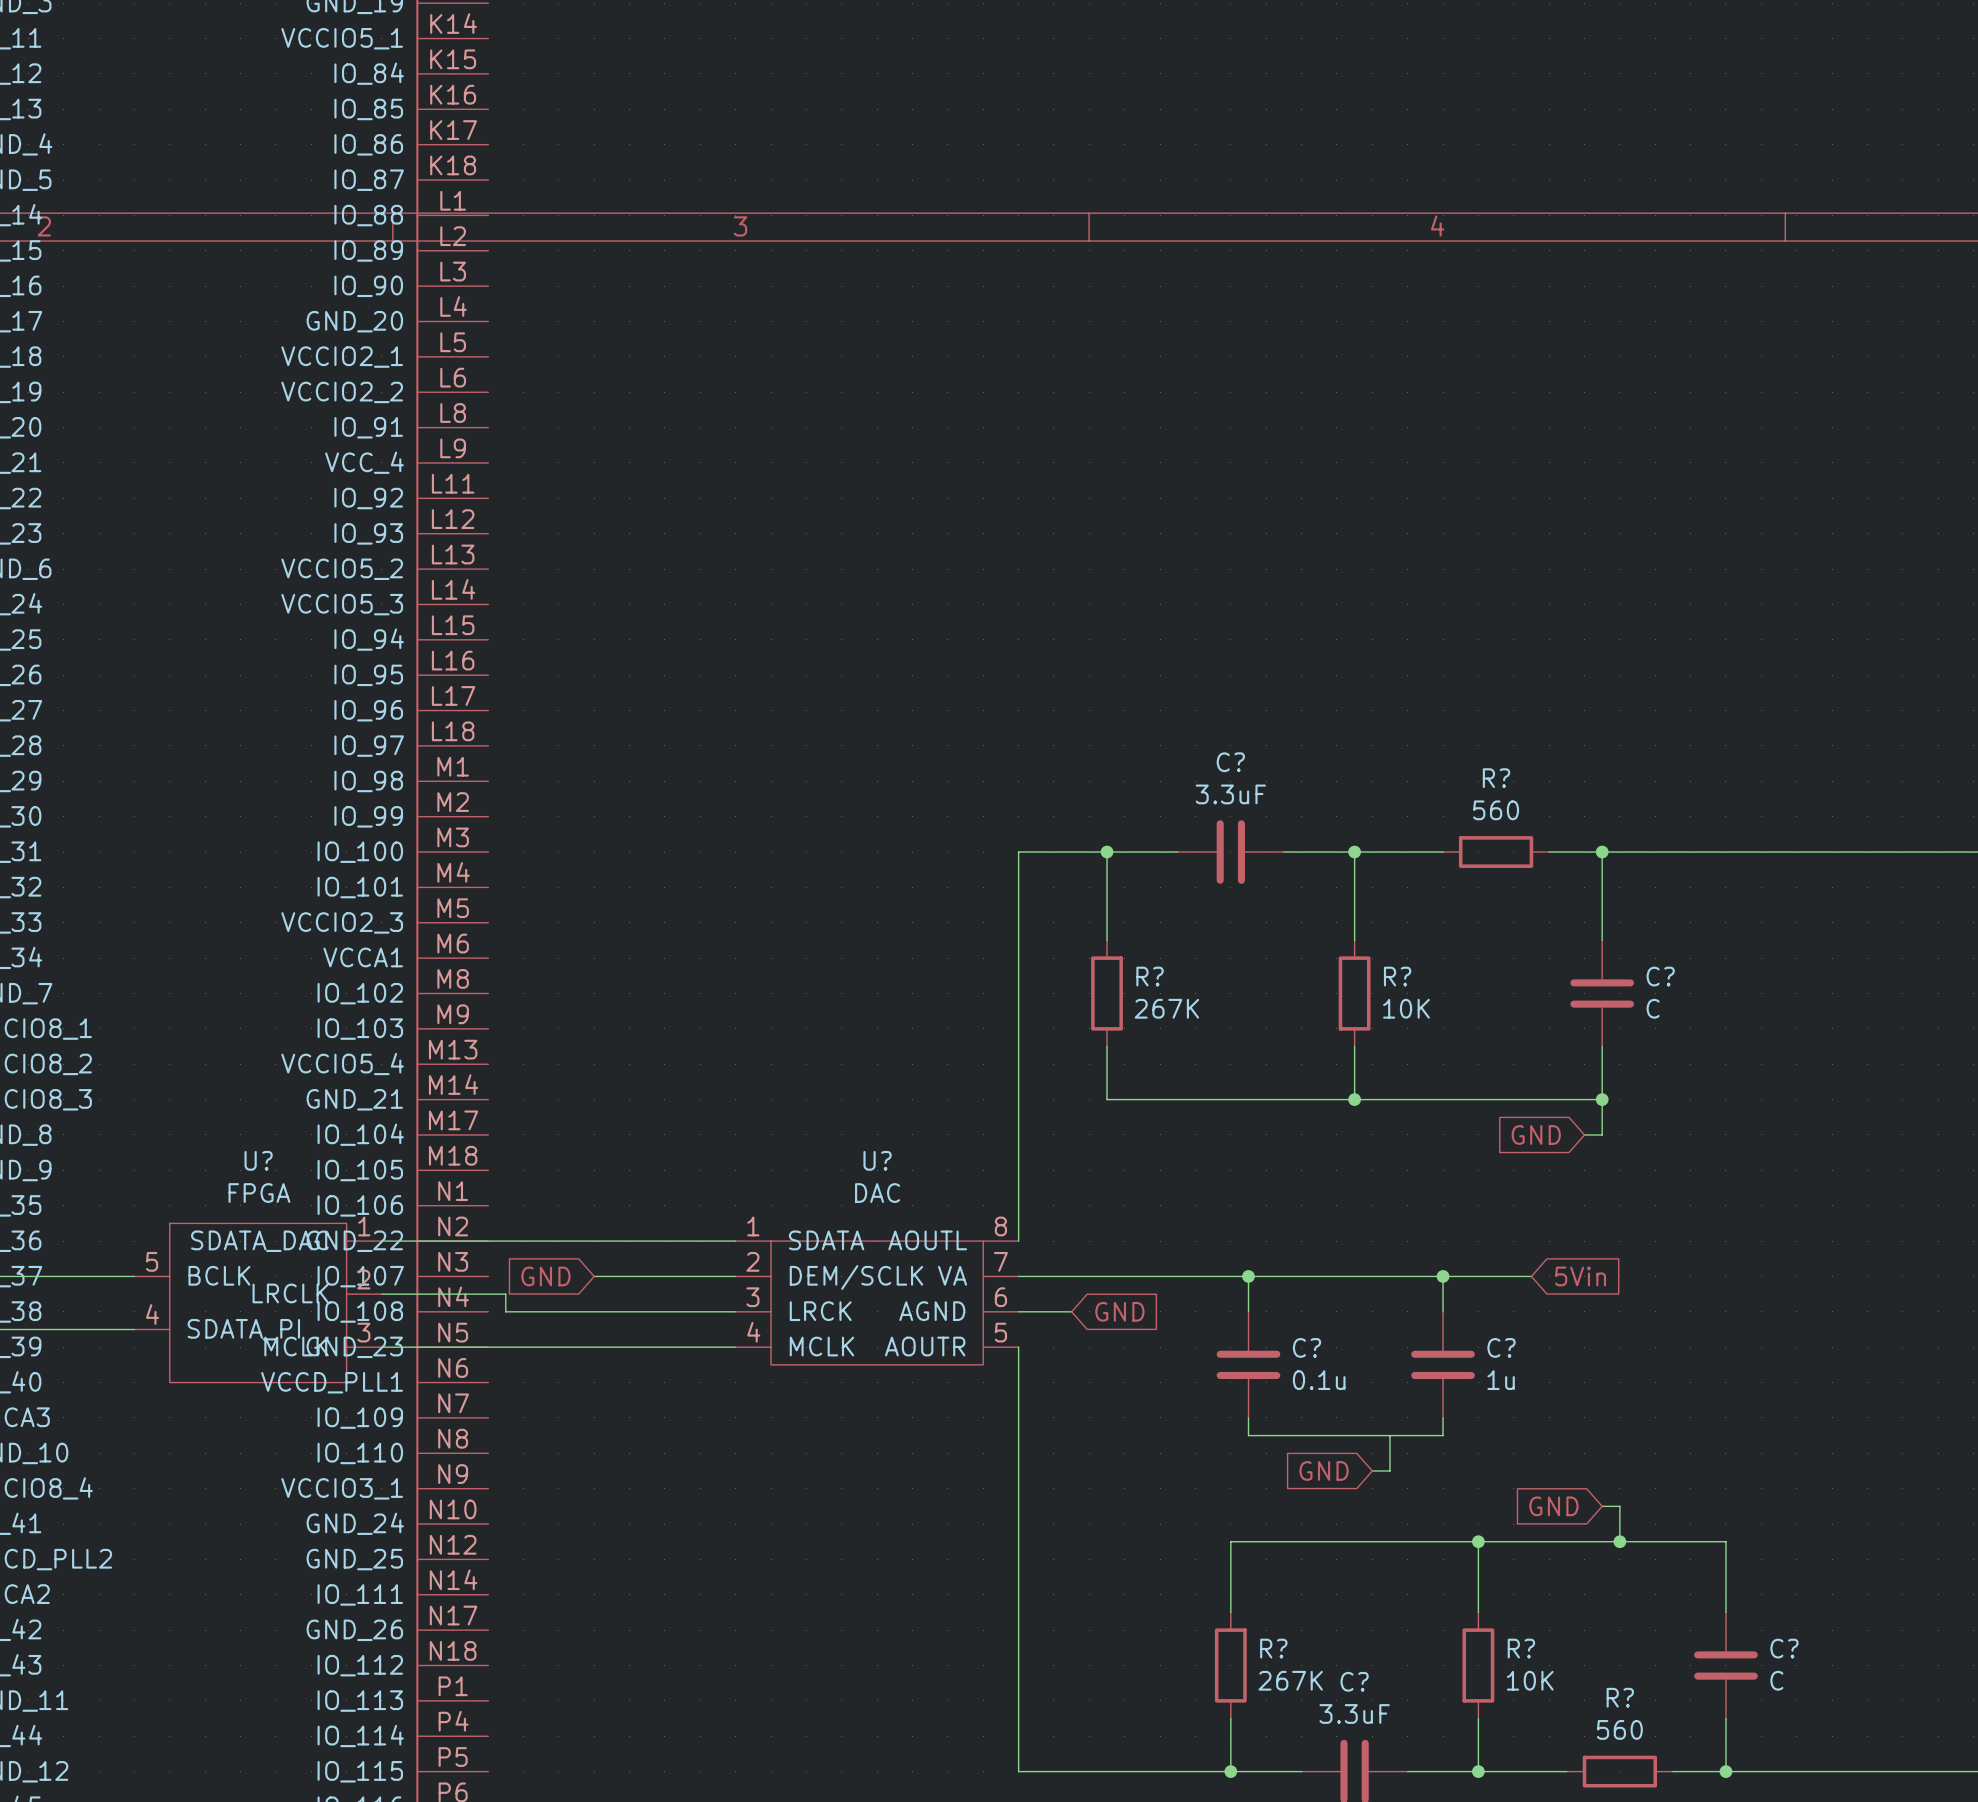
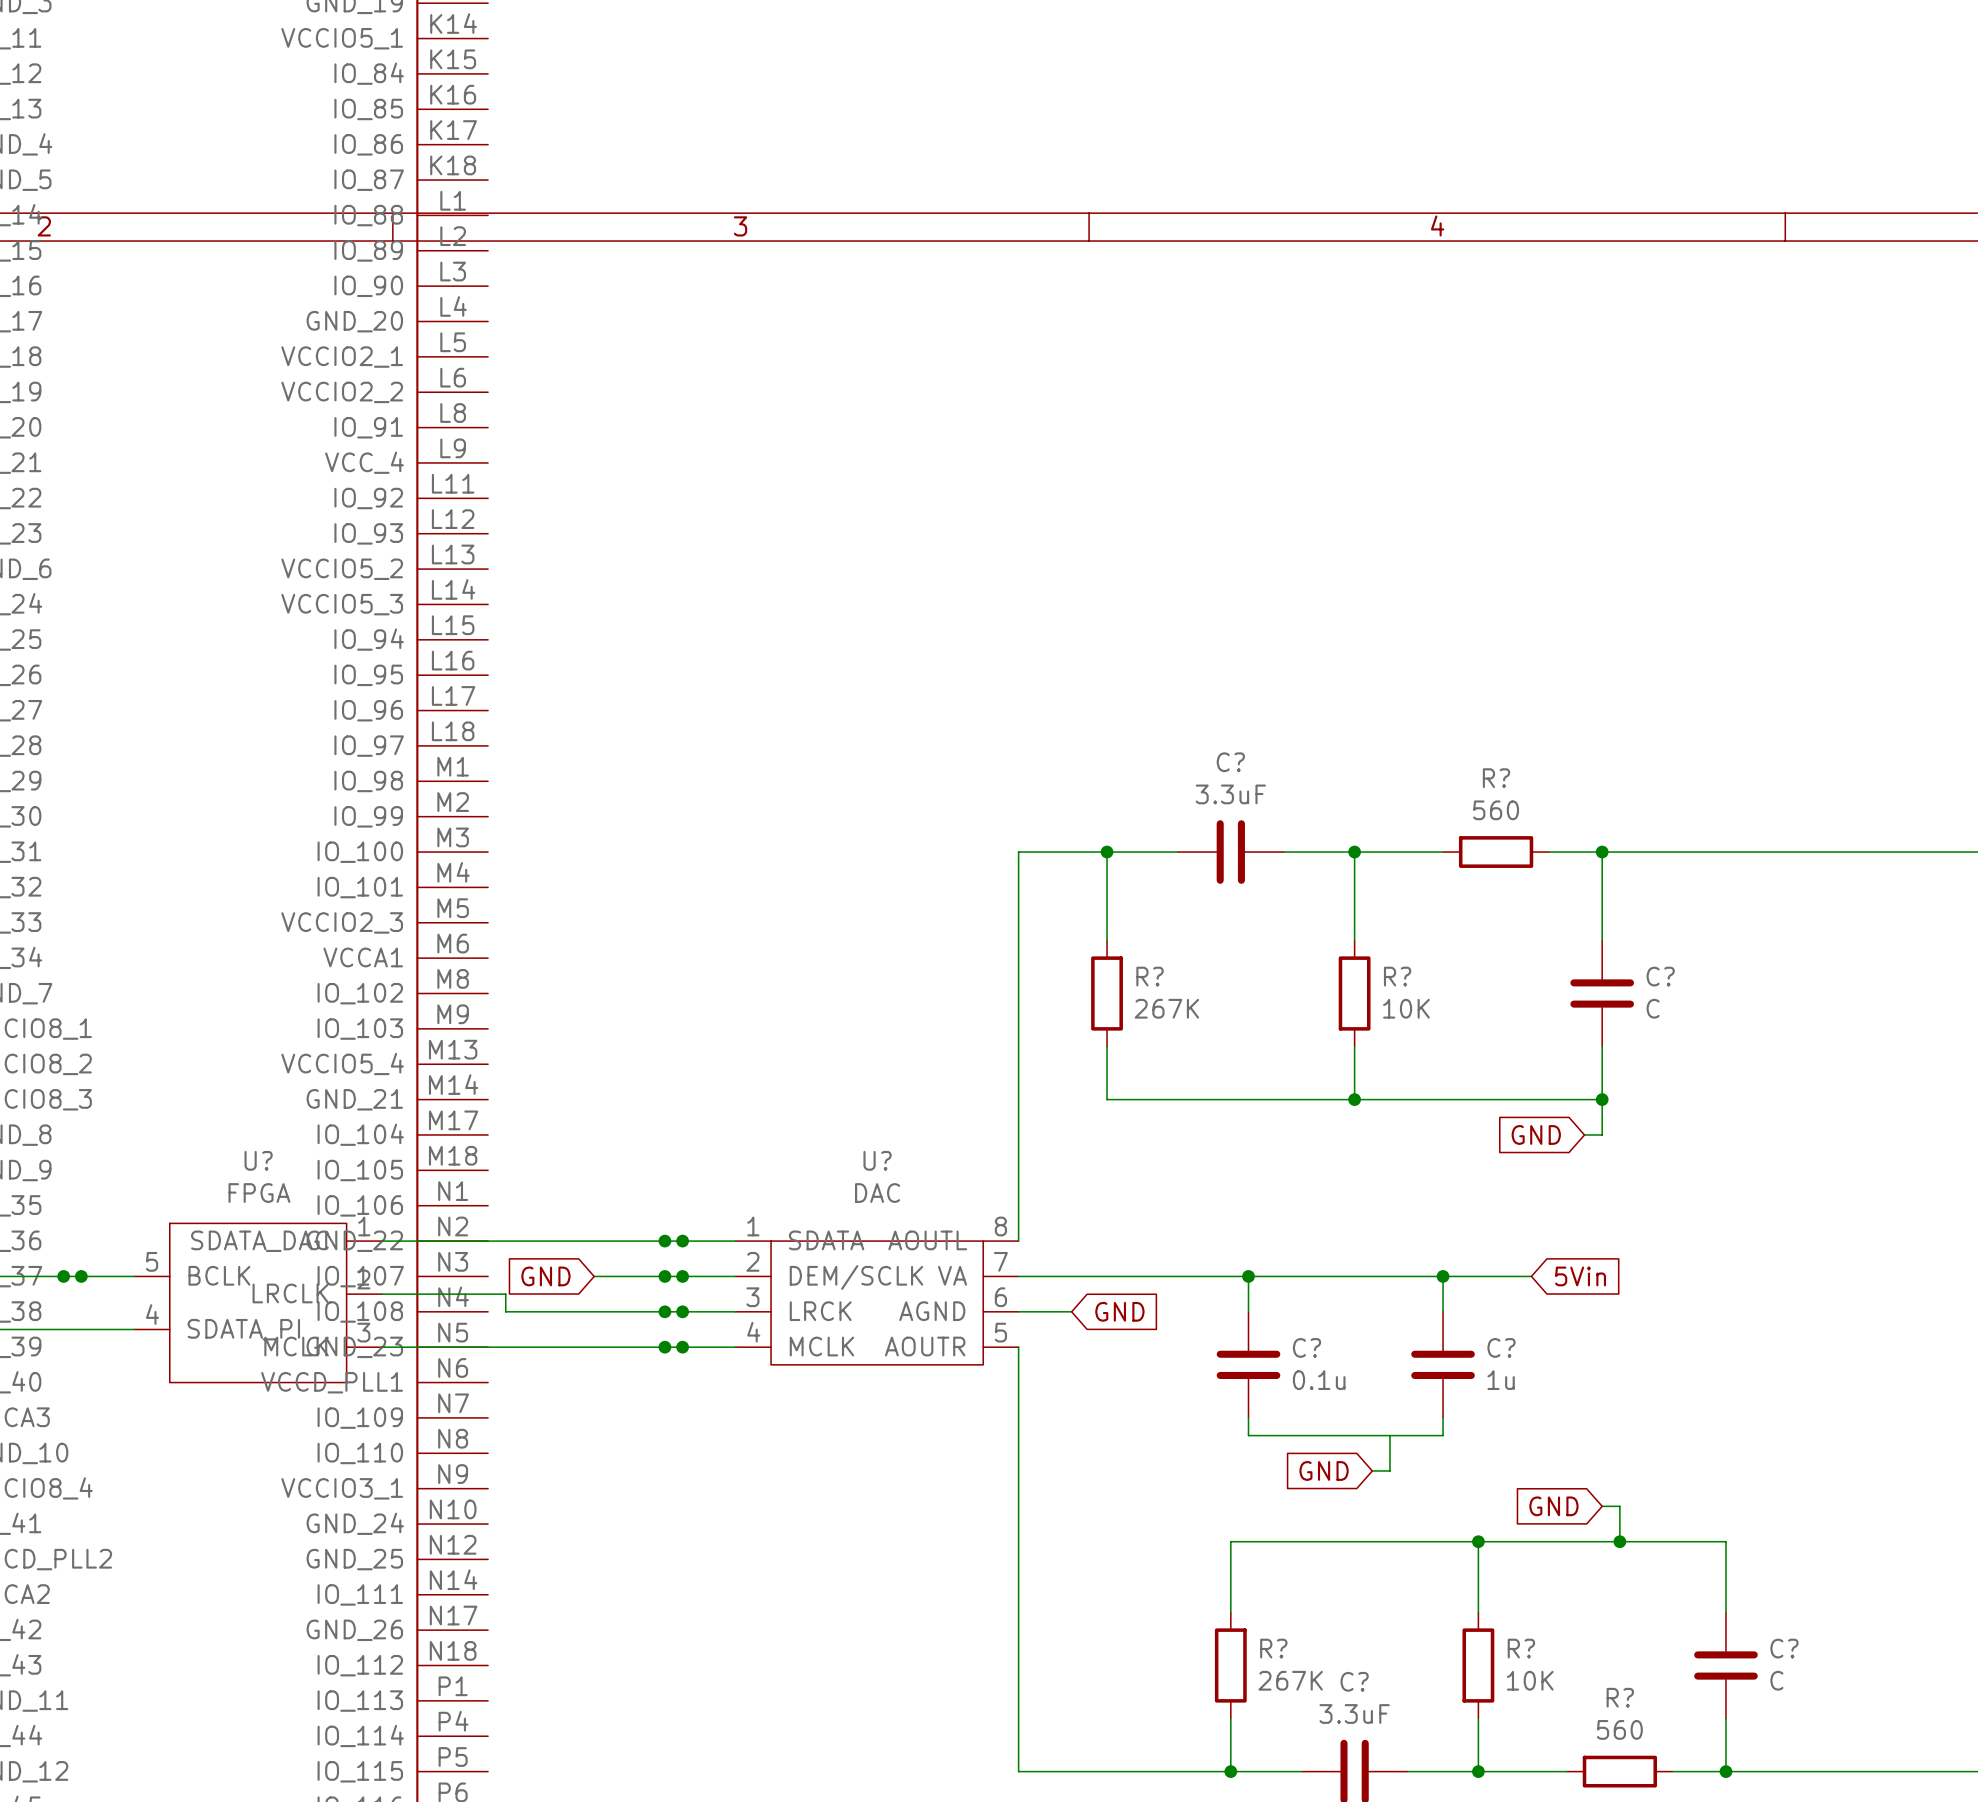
junction: none -> (664, 1241)
junction: none -> (682, 1241)
junction: none -> (63, 1276)
junction: none -> (81, 1276)
junction: none -> (664, 1276)
junction: none -> (682, 1276)
junction: none -> (664, 1311)
junction: none -> (682, 1311)
junction: none -> (664, 1347)
junction: none -> (682, 1347)

